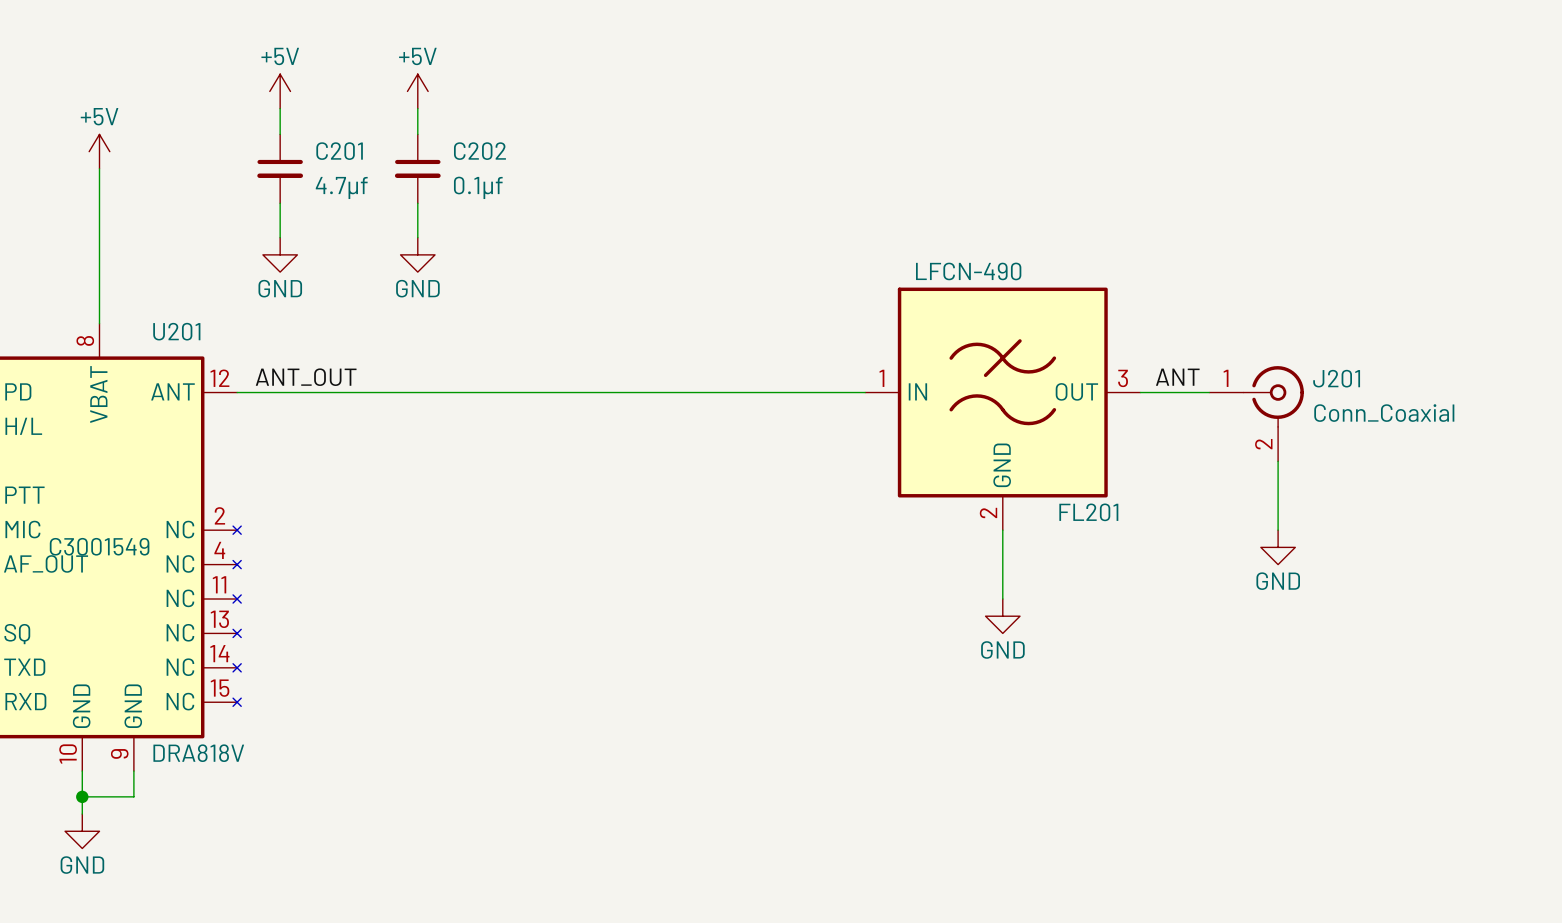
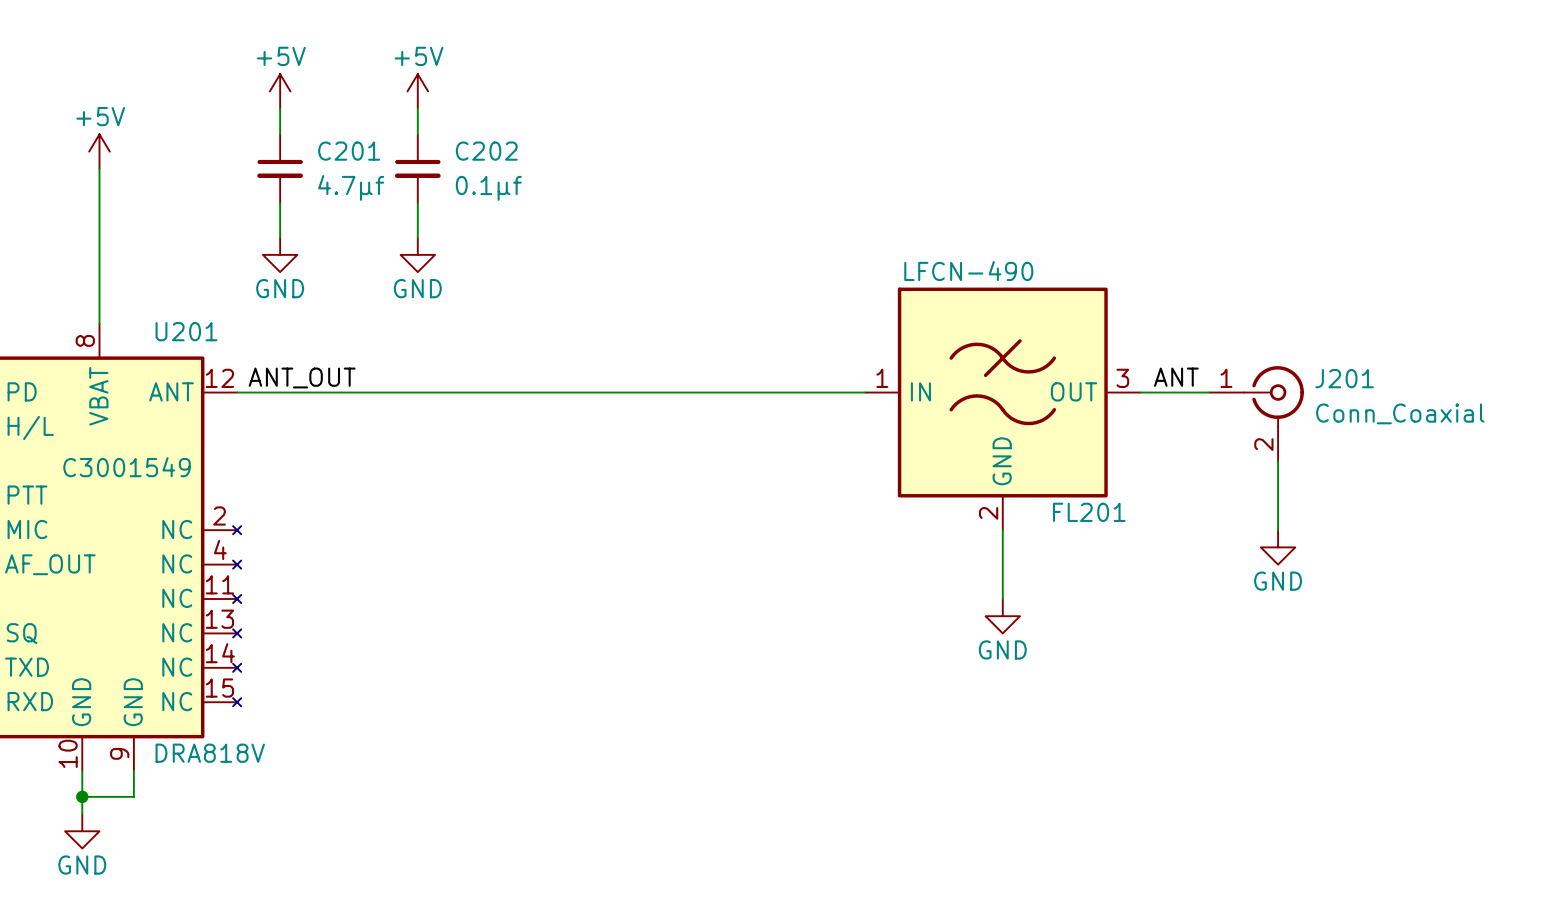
U201 text position: C3001549 (99, 546) -> C3001549 (127, 467)

